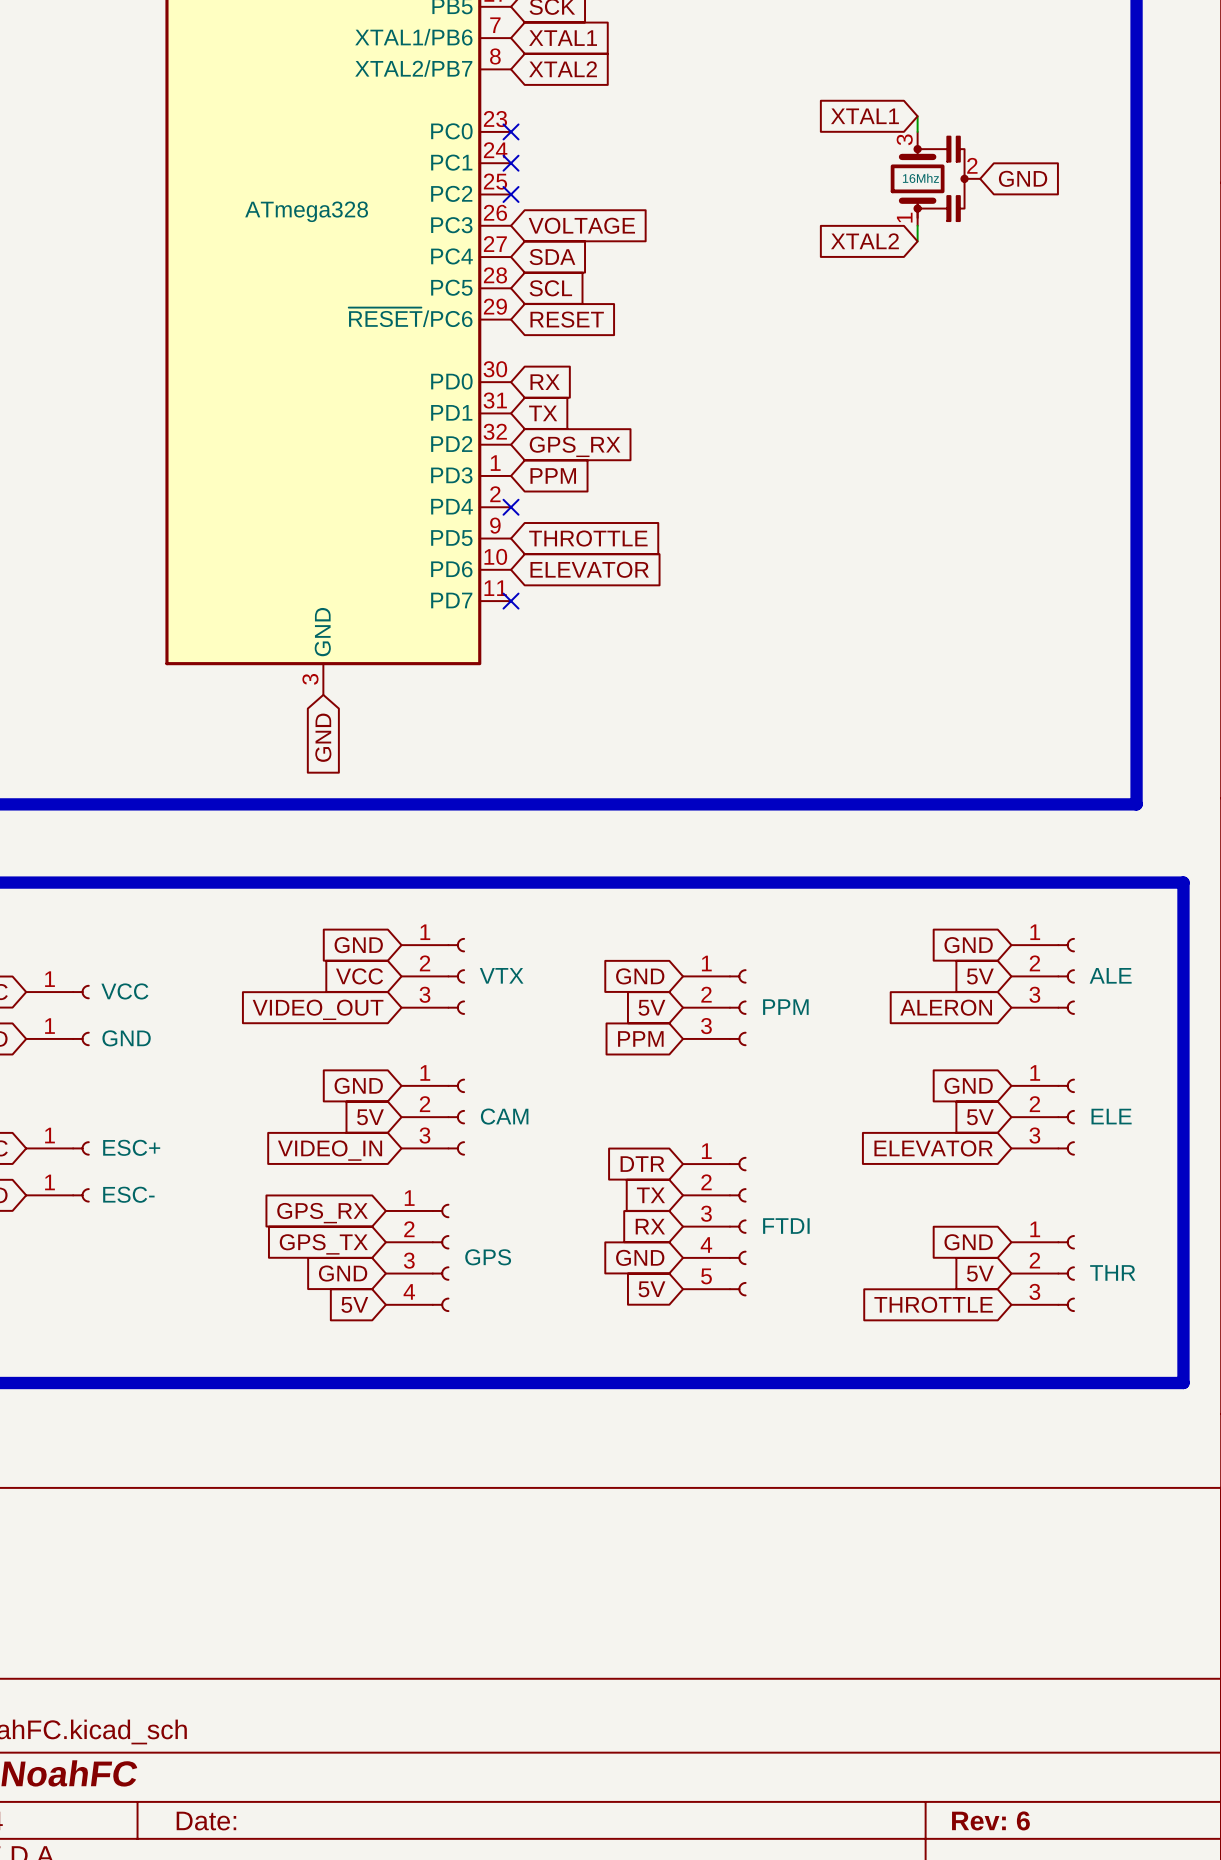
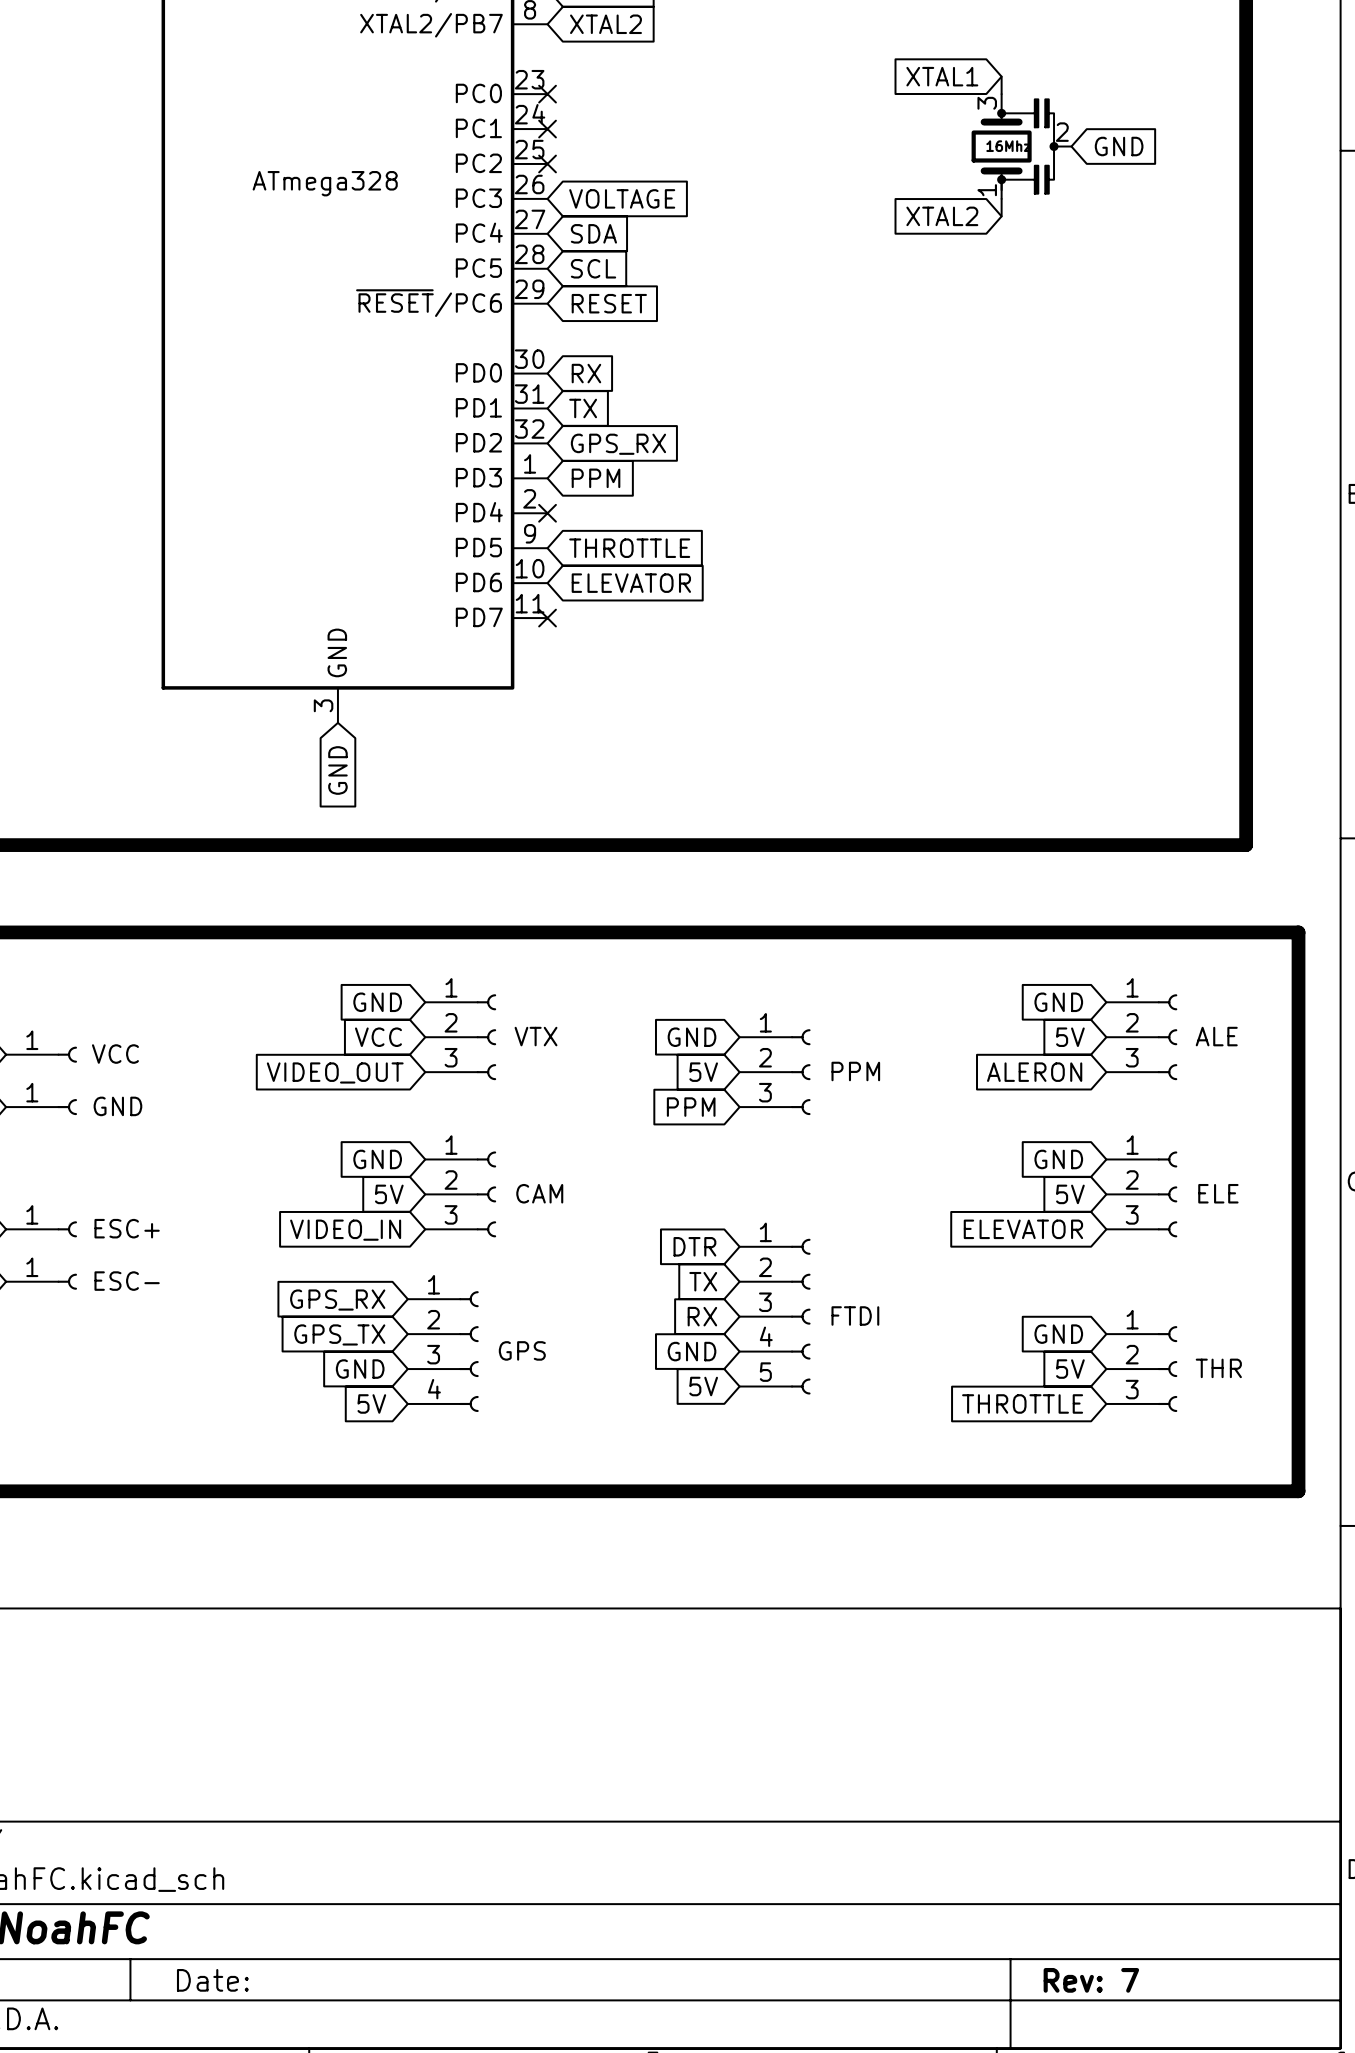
title block: Rev: 6 (990, 1820) -> Rev: 7 (1091, 1980)

